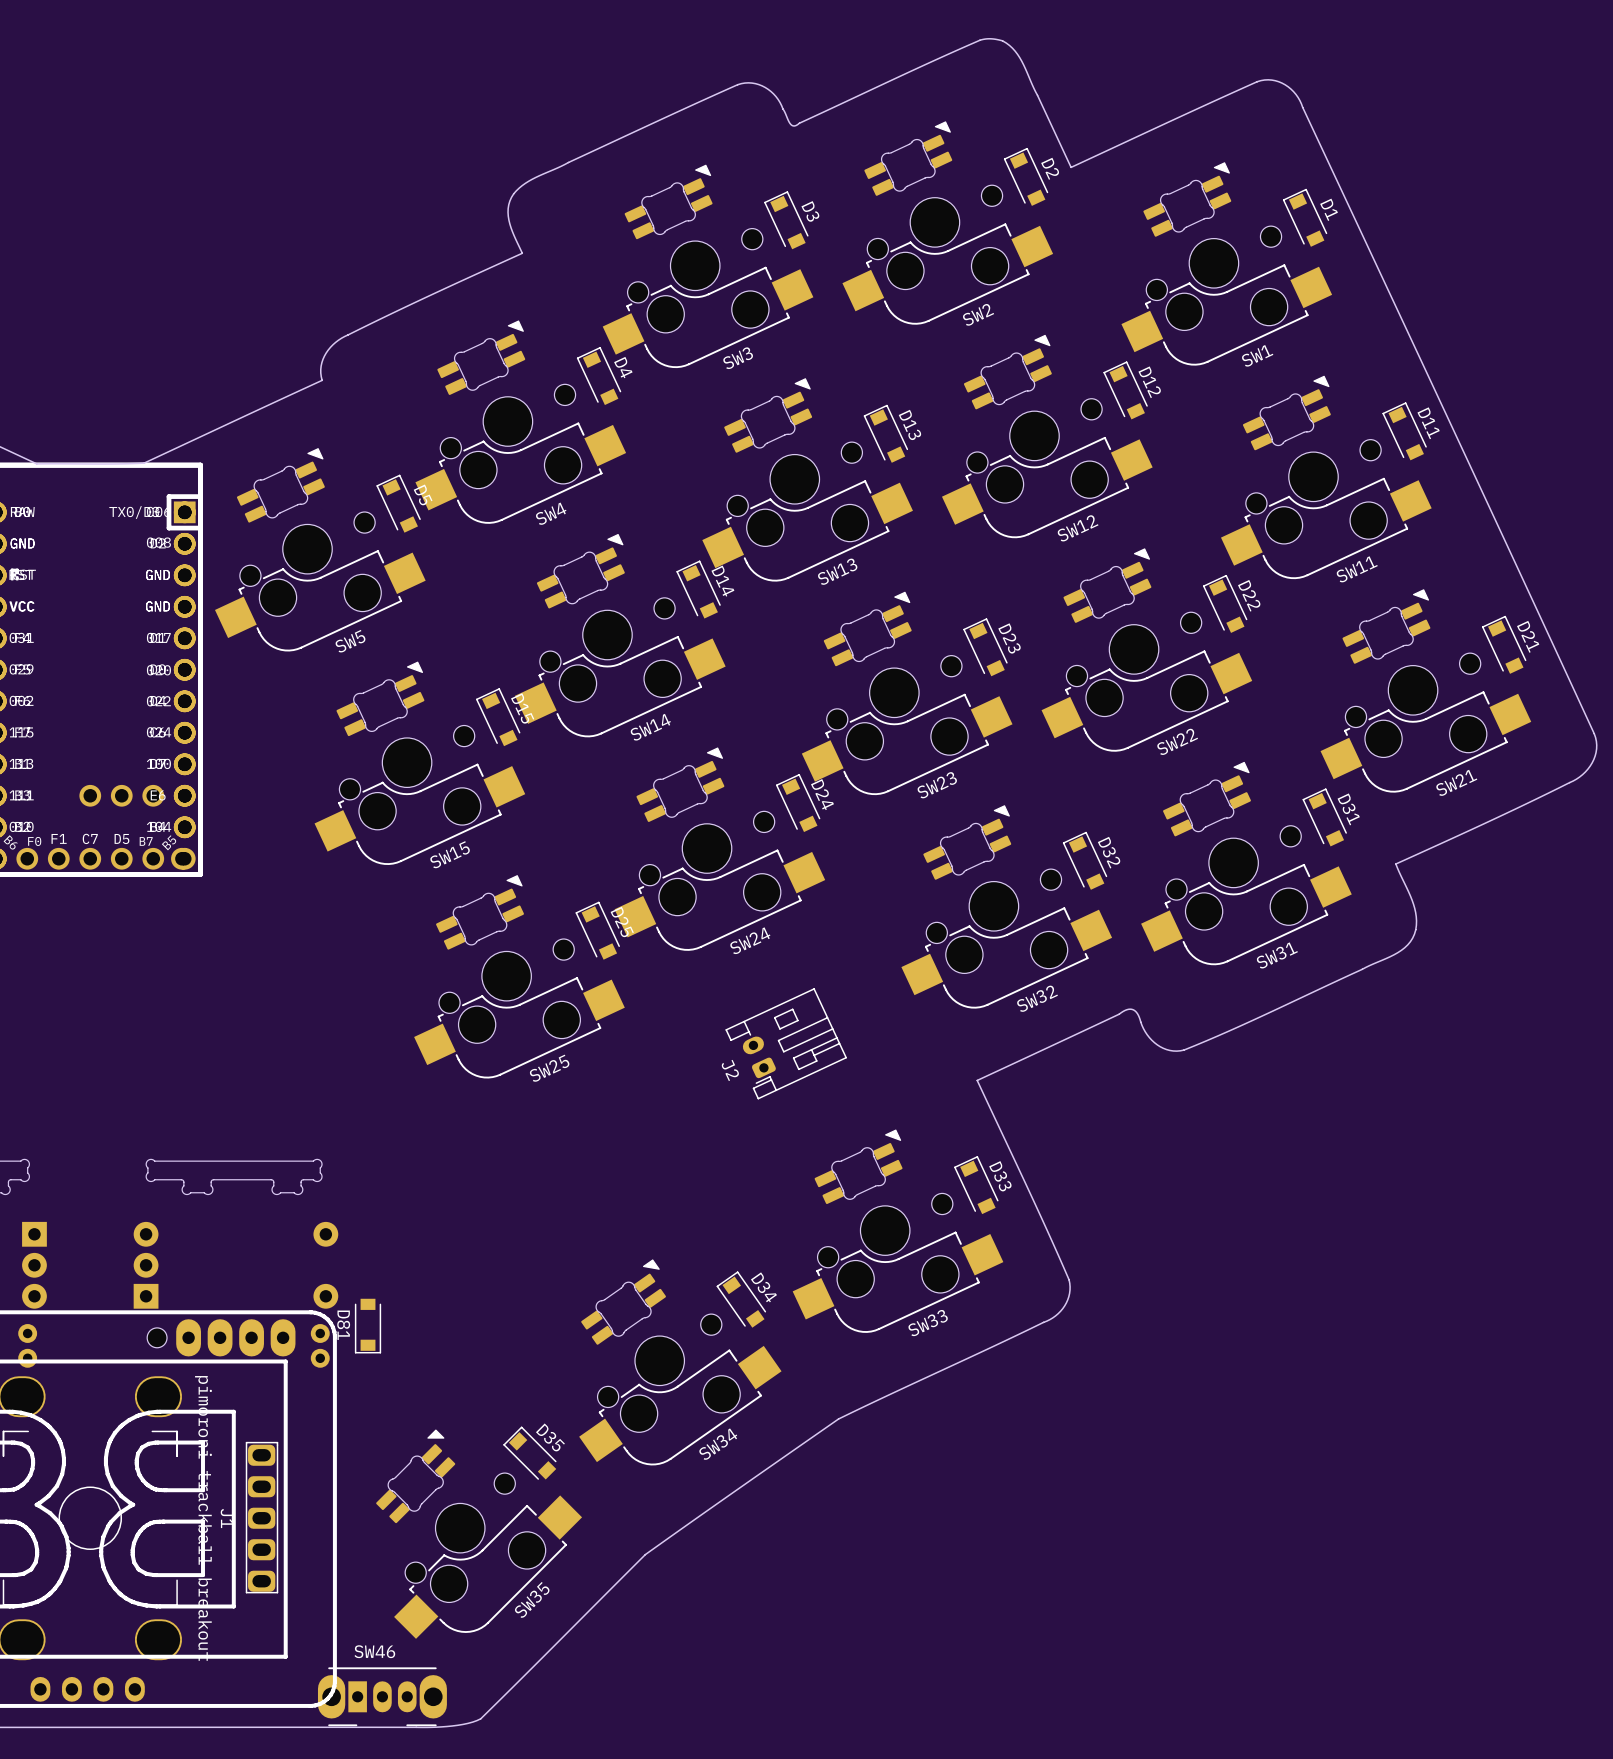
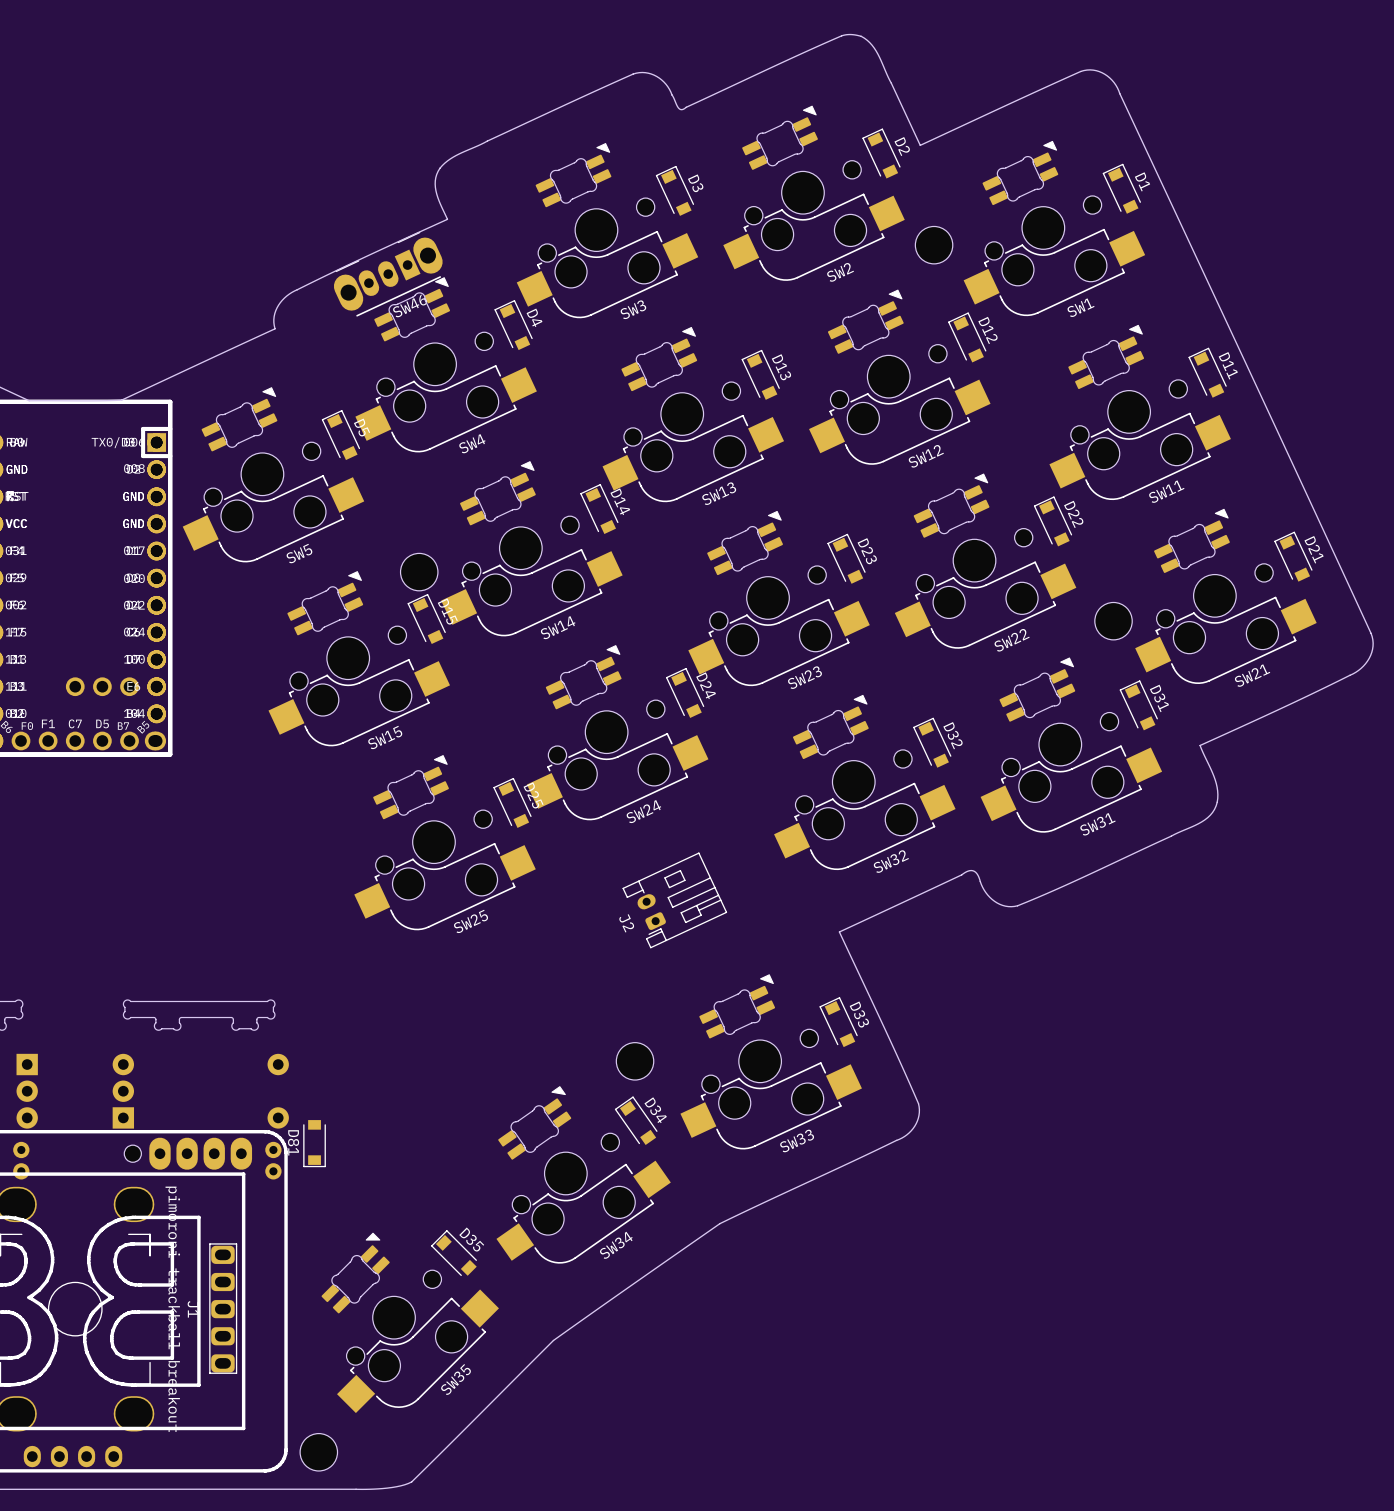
part: none -> (934, 245)
part: none -> (419, 572)
part: none -> (1113, 621)
part: none -> (635, 1061)
part: none -> (318, 1452)
SW46 rotation: 0° (382, 1696) -> 155° clockwise (388, 274)
SW46 position: (382, 1696) -> (388, 274)

